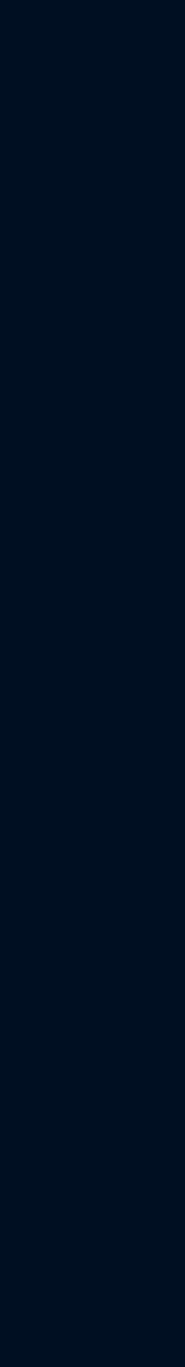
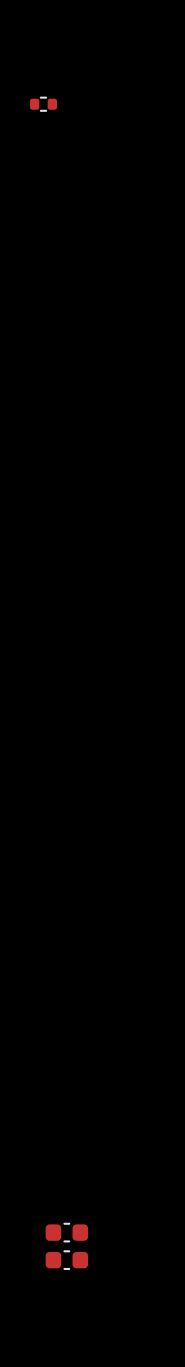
part: none -> (43, 104)
part: none -> (66, 1232)
part: none -> (66, 1260)

